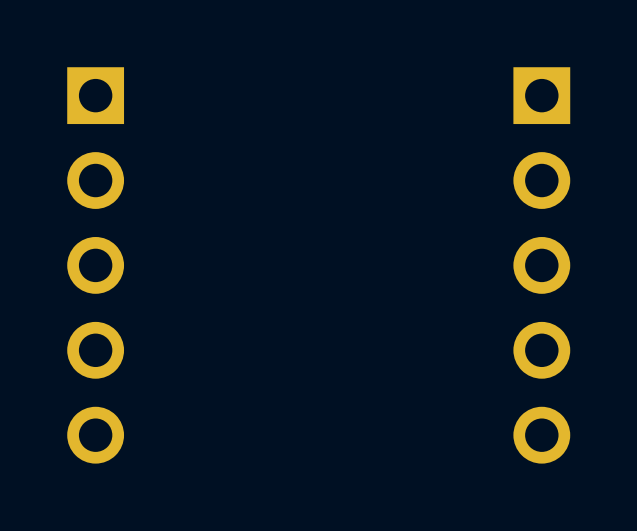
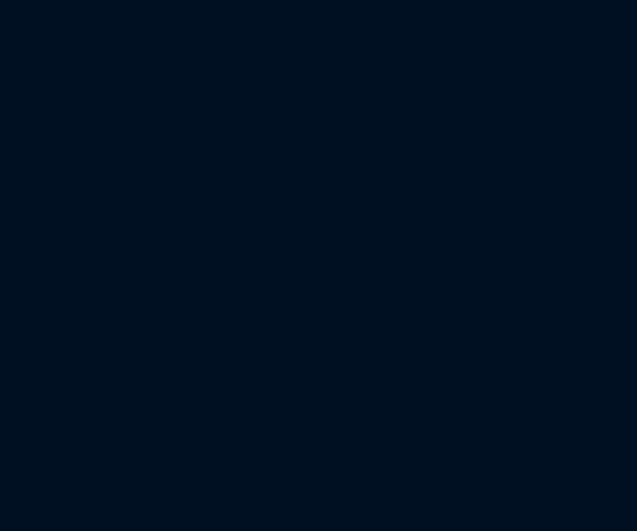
part: (95, 265) -> none
part: (541, 265) -> none

